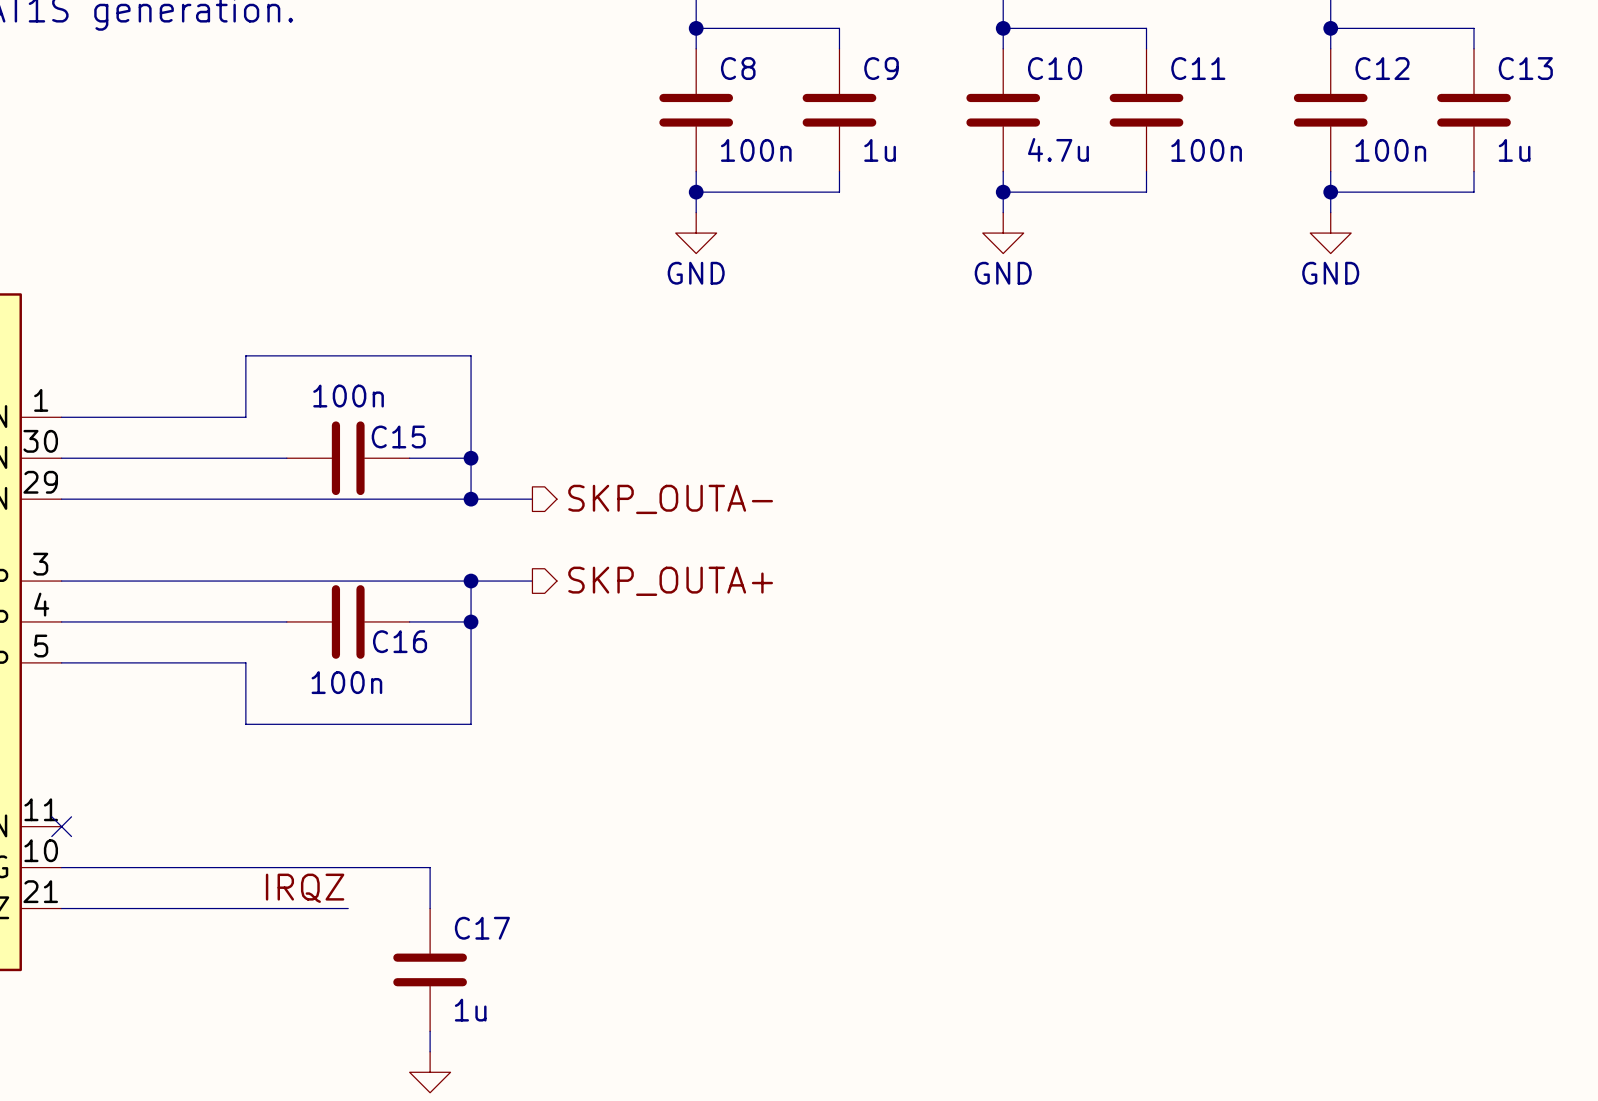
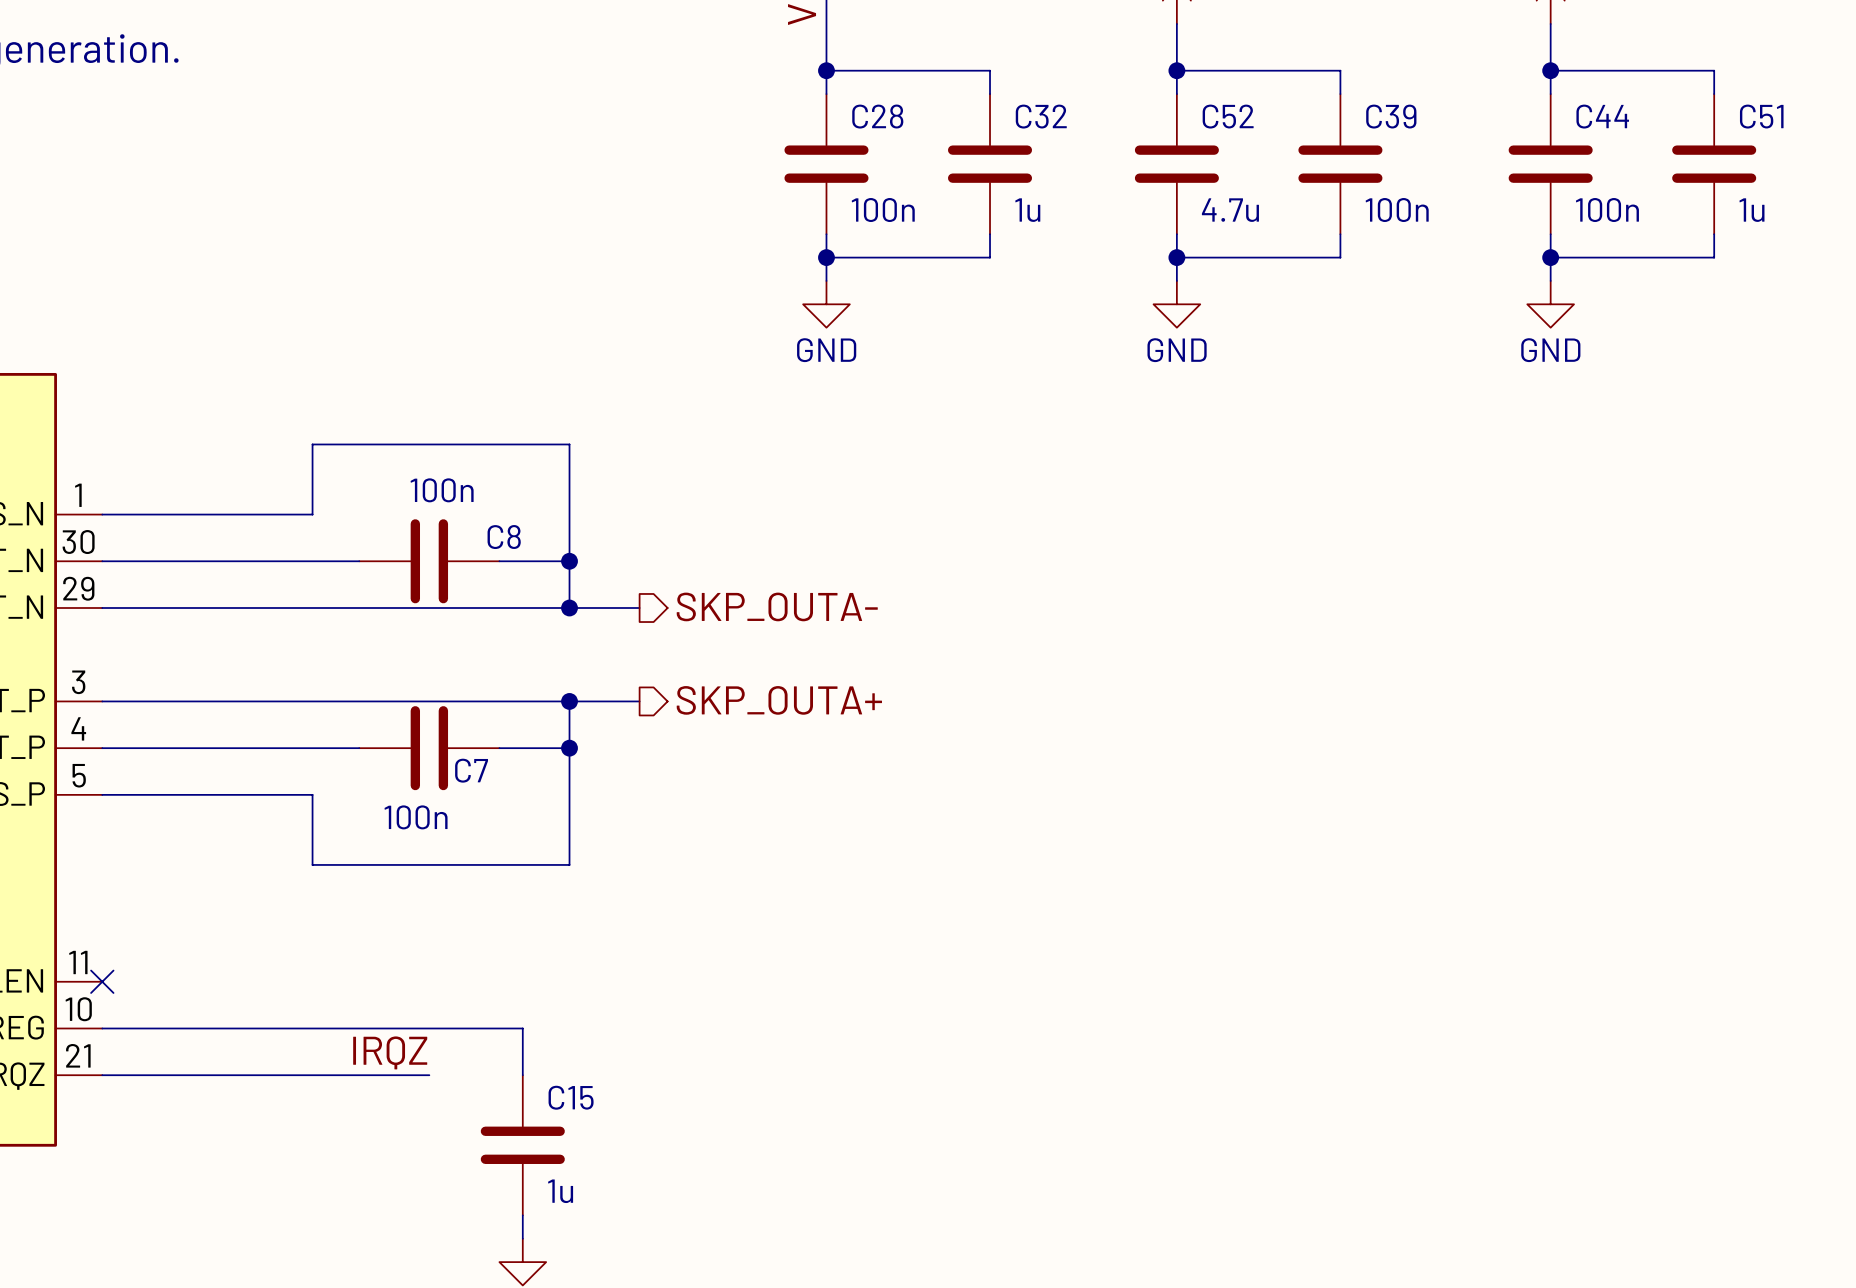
C8 name: C8 (738, 68) -> C28 (877, 116)
C9 name: C9 (881, 68) -> C32 (1041, 116)
C10 name: C10 (1055, 68) -> C52 (1228, 116)
C11 name: C11 (1198, 68) -> C39 (1391, 116)
C12 name: C12 (1382, 68) -> C44 (1602, 116)
C13 name: C13 (1525, 68) -> C51 (1761, 116)
C15 name: C15 (398, 436) -> C8 (504, 537)
C16 name: C16 (400, 641) -> C7 (471, 770)
C17 name: C17 (482, 928) -> C15 (571, 1097)

